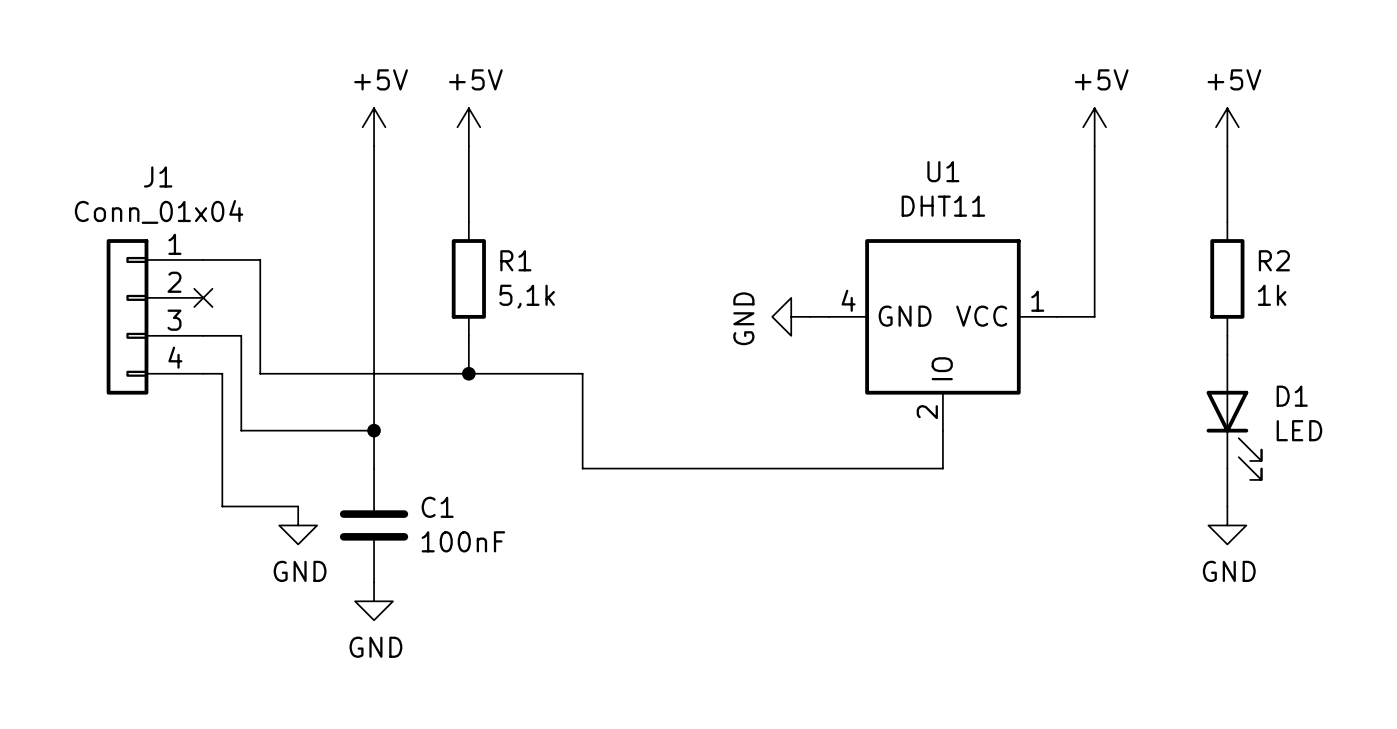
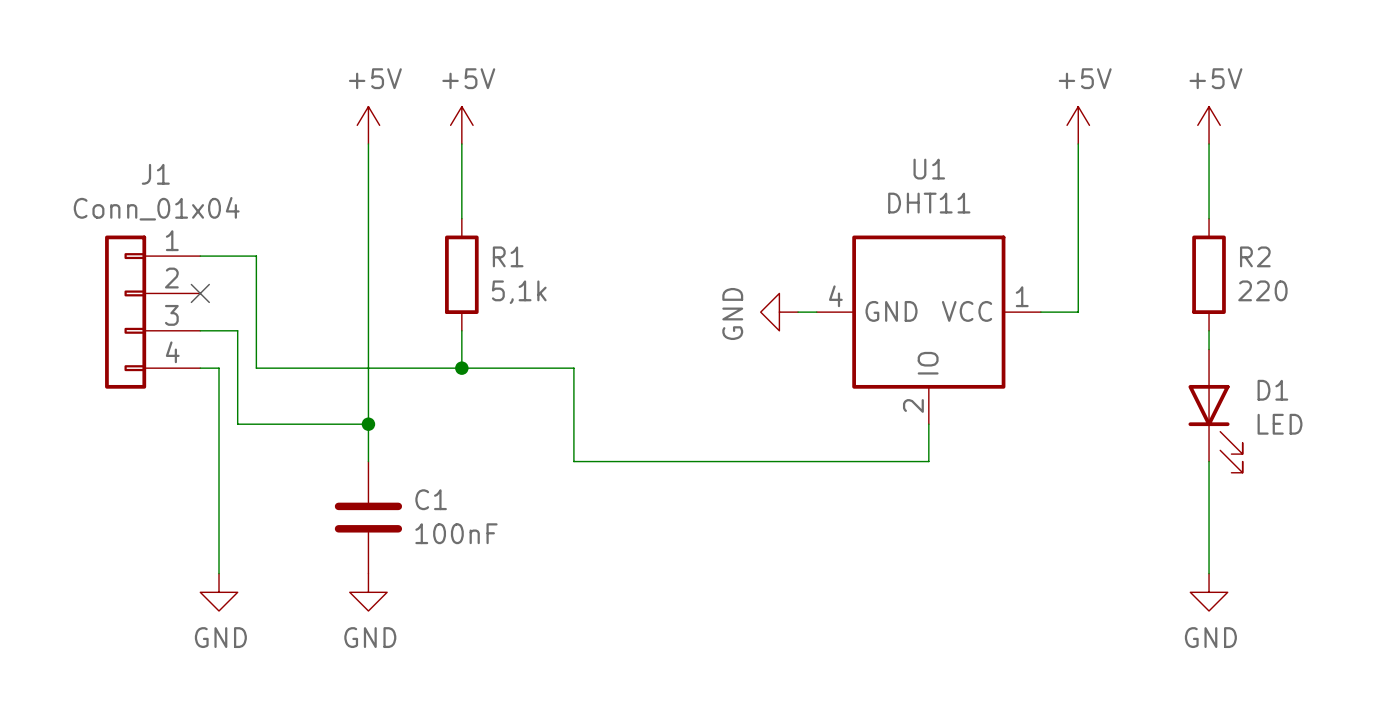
R2 value: 1k (1272, 295) -> 220 (1262, 290)
wire: (222, 506) (298, 506) -> (219, 498) (219, 573)
wire: none -> (1209, 498) (1209, 573)
power symbol position: GND (298, 525) -> GND (219, 592)
power symbol position: GND (1227, 525) -> GND (1209, 592)

